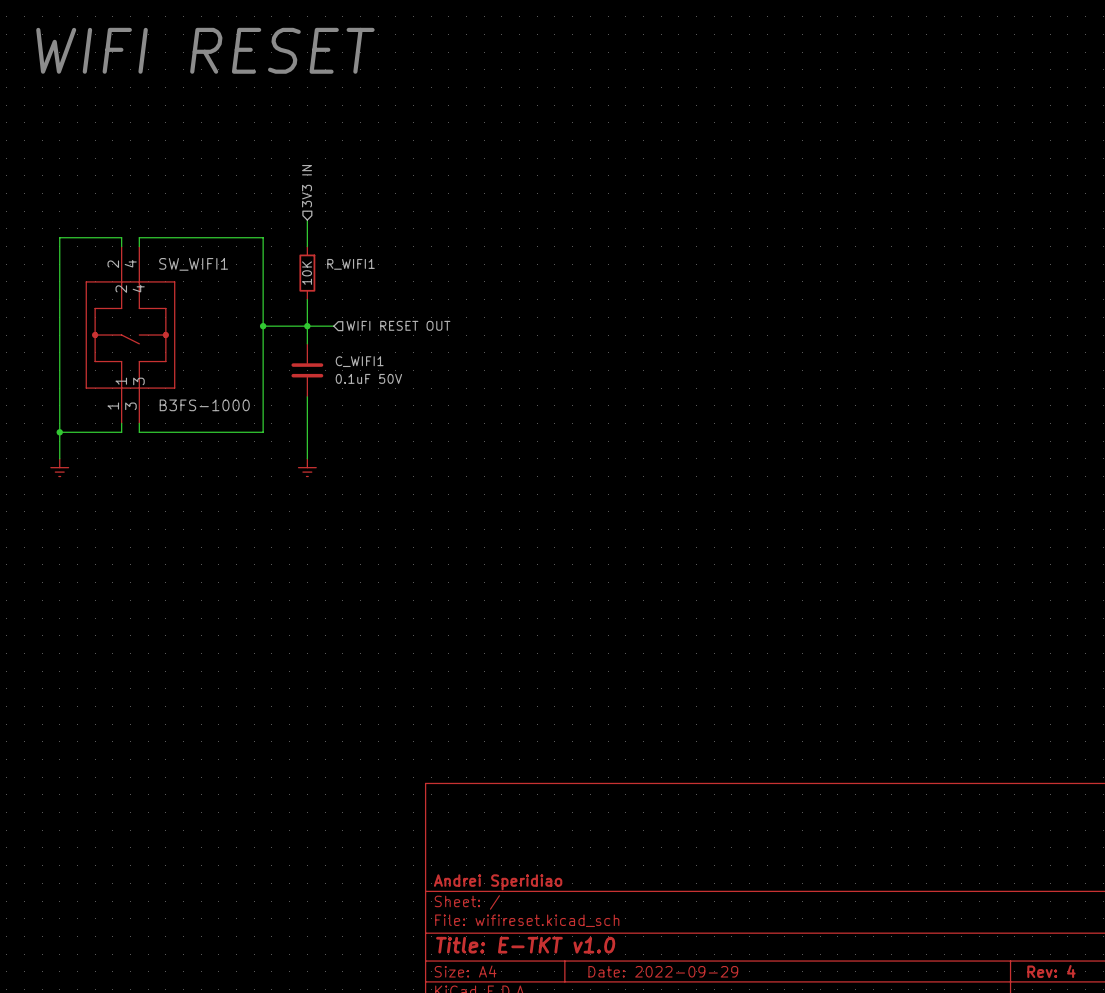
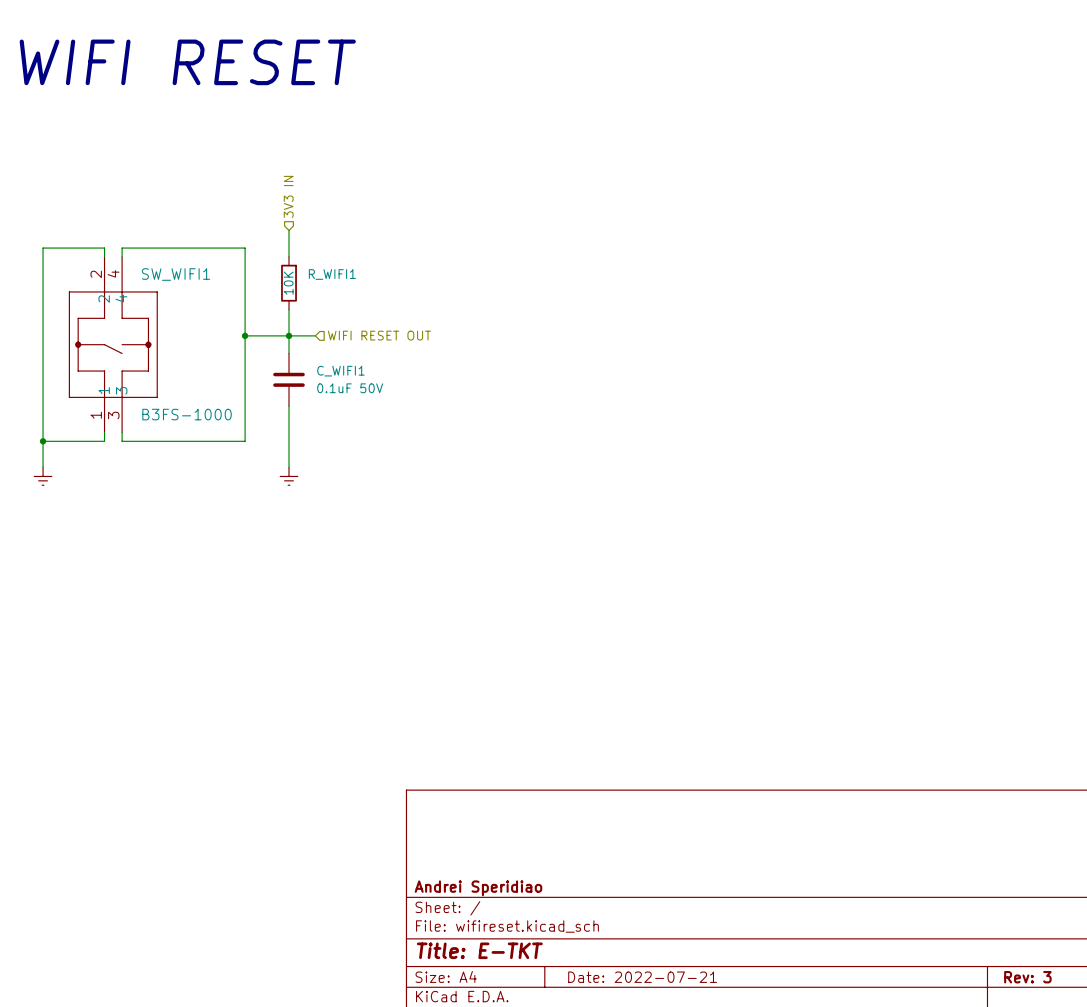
title block: Title: E-TKT v1.0 (525, 945) -> Title: E-TKT (479, 950)
title block: Date: 2022-09-29 (663, 971) -> Date: 2022-07-21 (642, 977)
title block: Rev: 4 (1051, 971) -> Rev: 3 (1027, 977)

